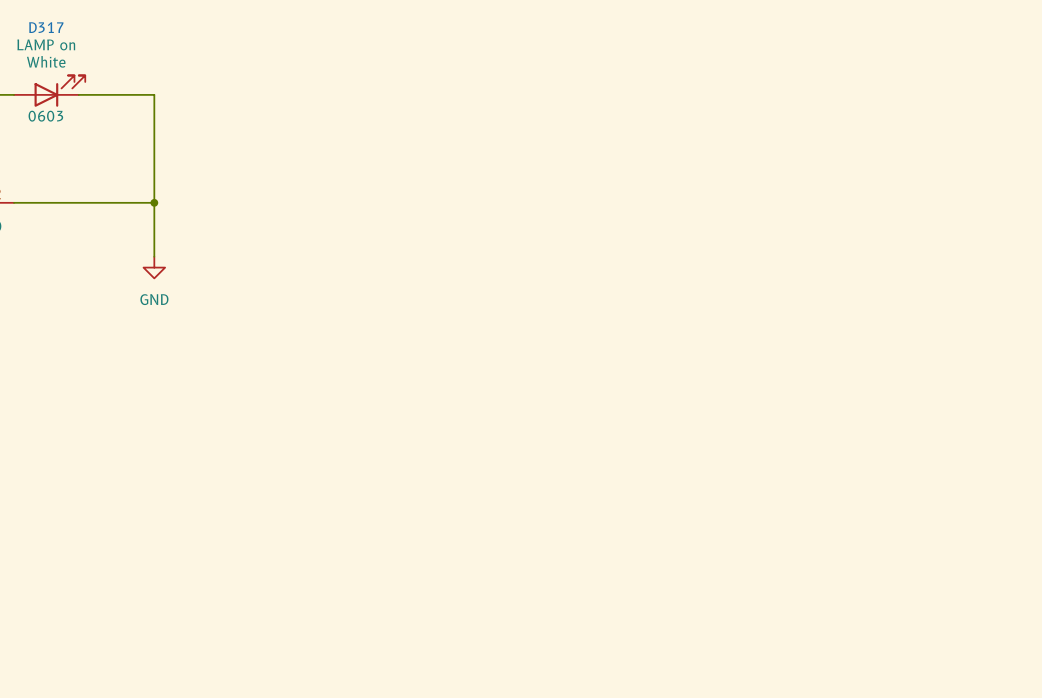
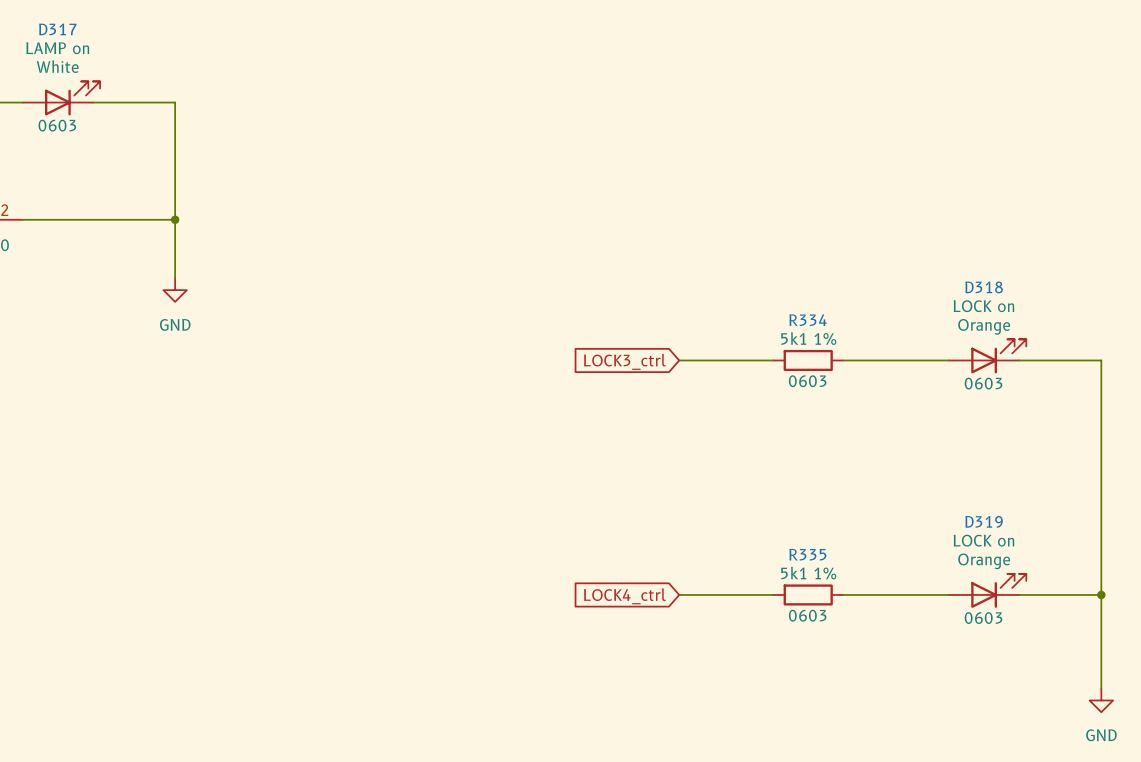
D318: none -> LOCK on (987, 356)
wire: none -> (679, 360) (773, 360)
R334: none -> 5k1 (808, 360)
wire: none -> (843, 360) (948, 360)
wire: none -> (1019, 360) (1101, 360) (1101, 688)
global label: none -> LOCK3_ctrl (624, 361)
D319: none -> LOCK on (987, 590)
wire: none -> (679, 594) (773, 594)
R335: none -> 5k1 (808, 594)
wire: none -> (843, 594) (948, 594)
wire: none -> (1019, 594) (1101, 594)
junction: none -> (1101, 594)
global label: none -> LOCK4_ctrl (624, 596)
power symbol: none -> GND (1101, 700)

